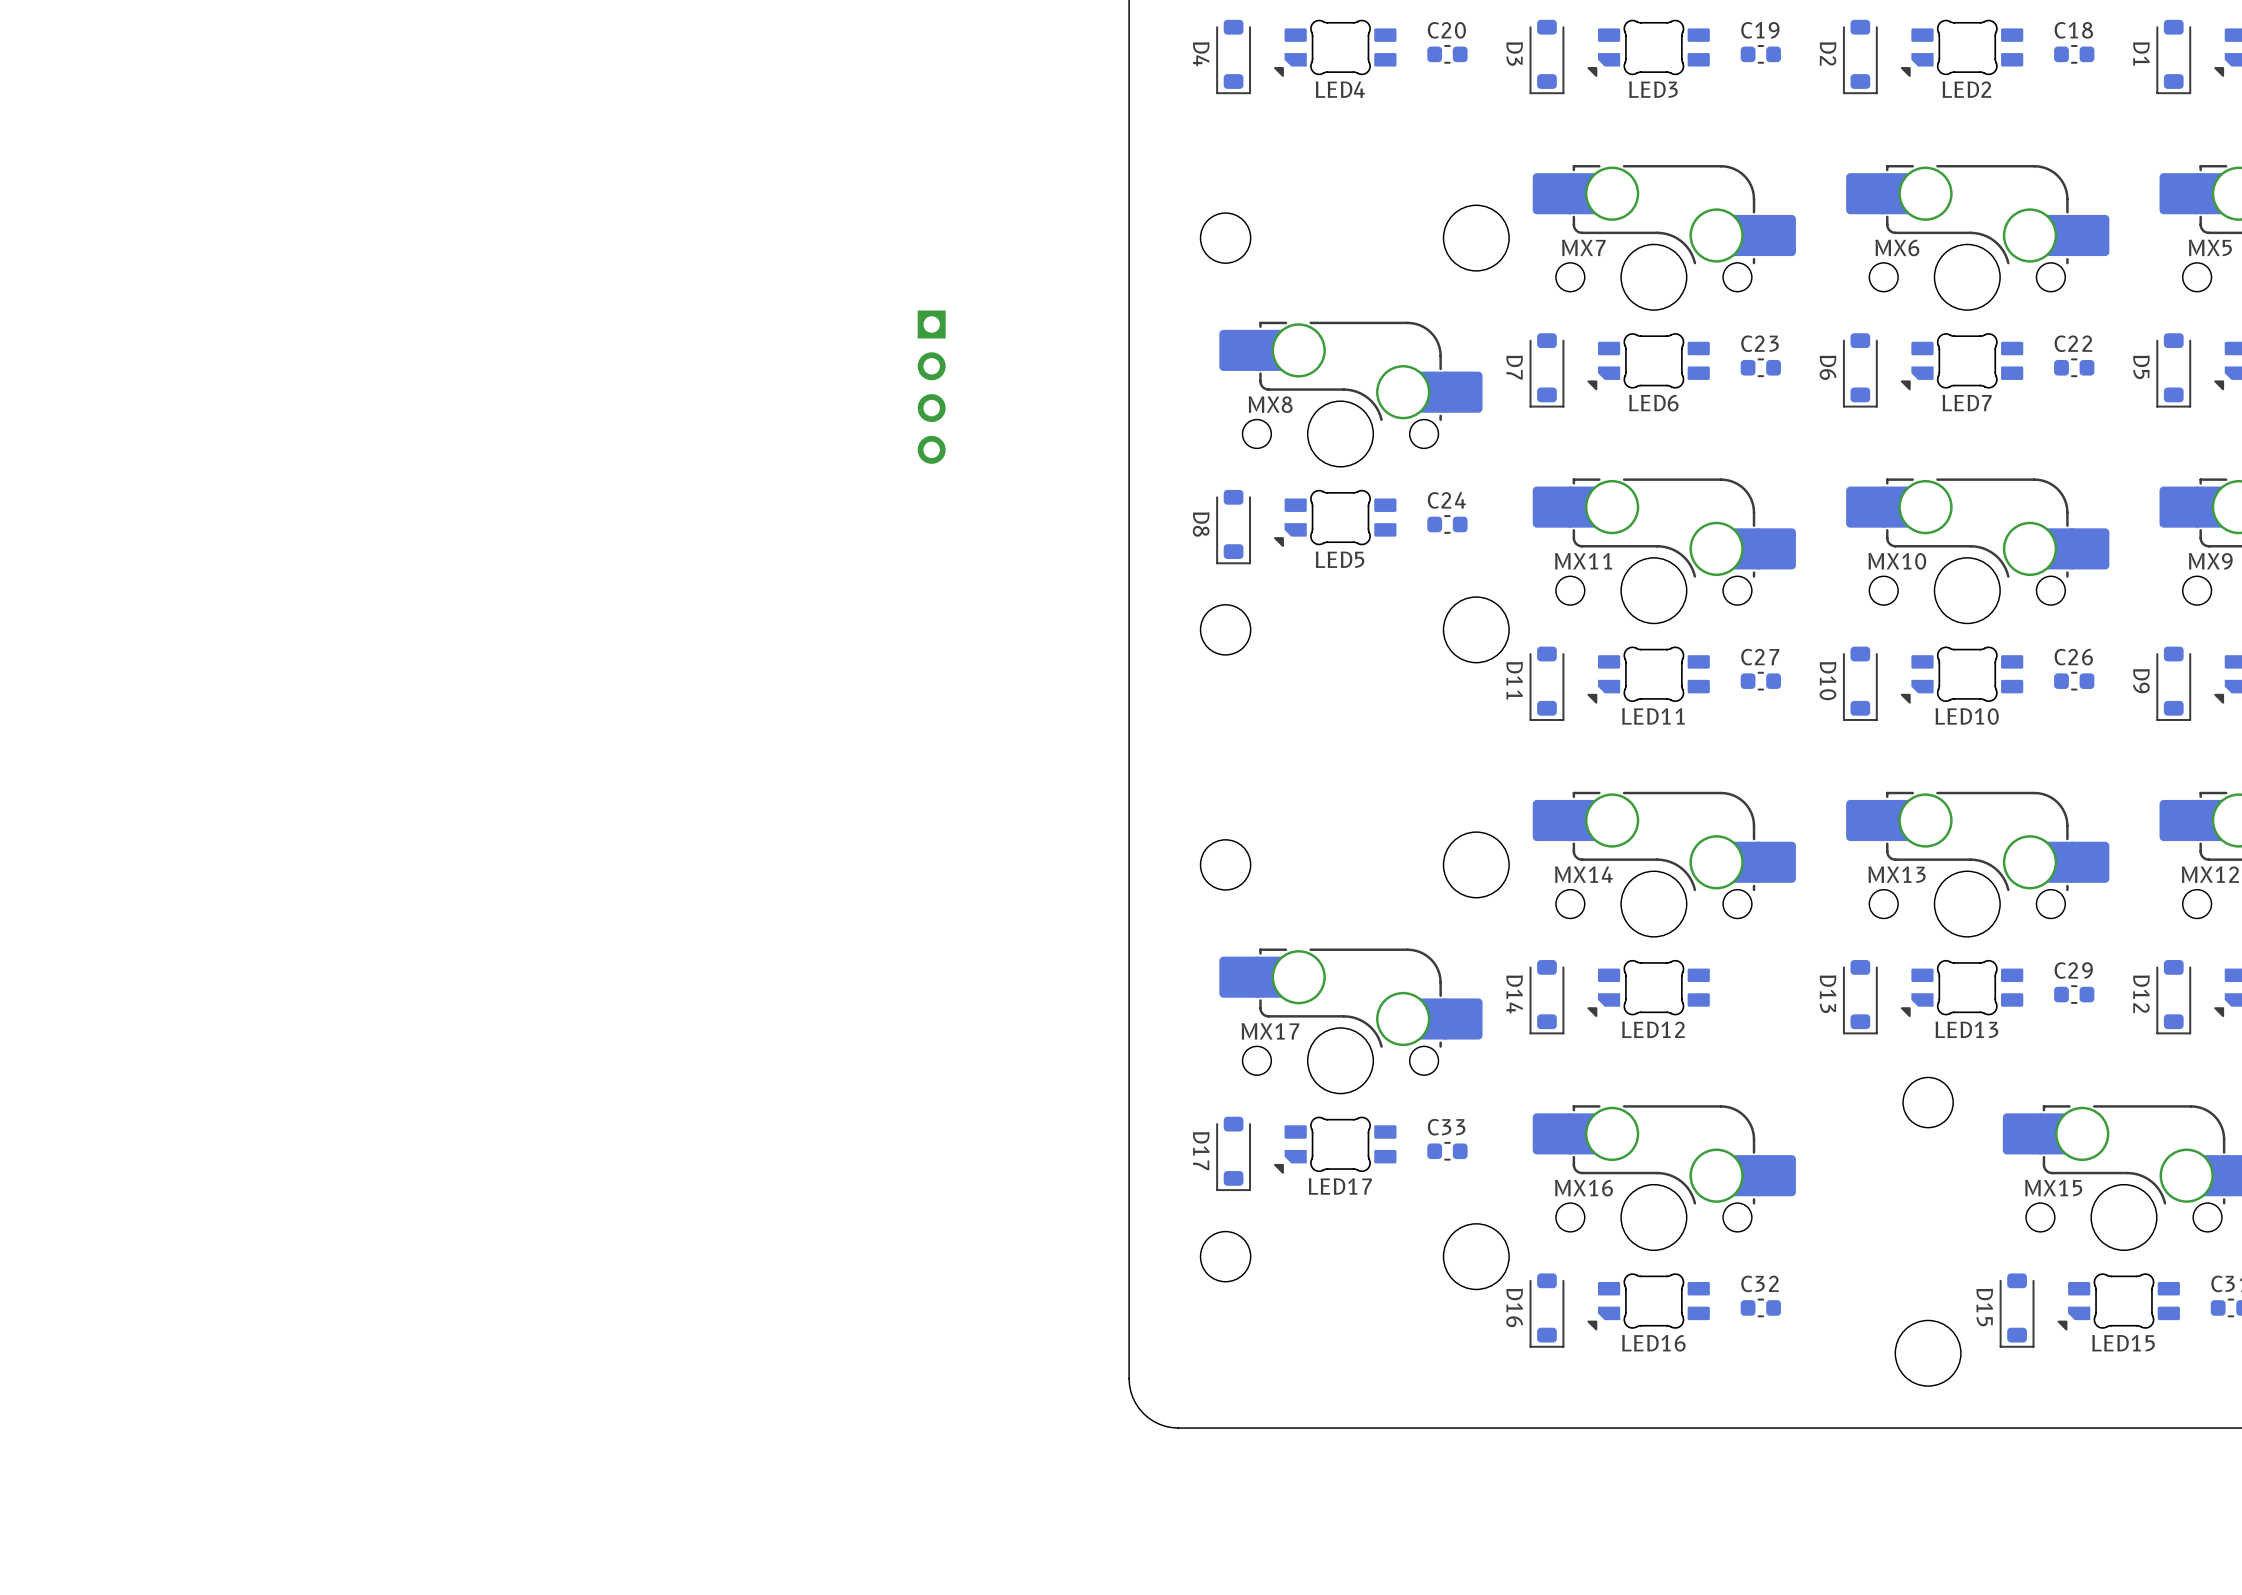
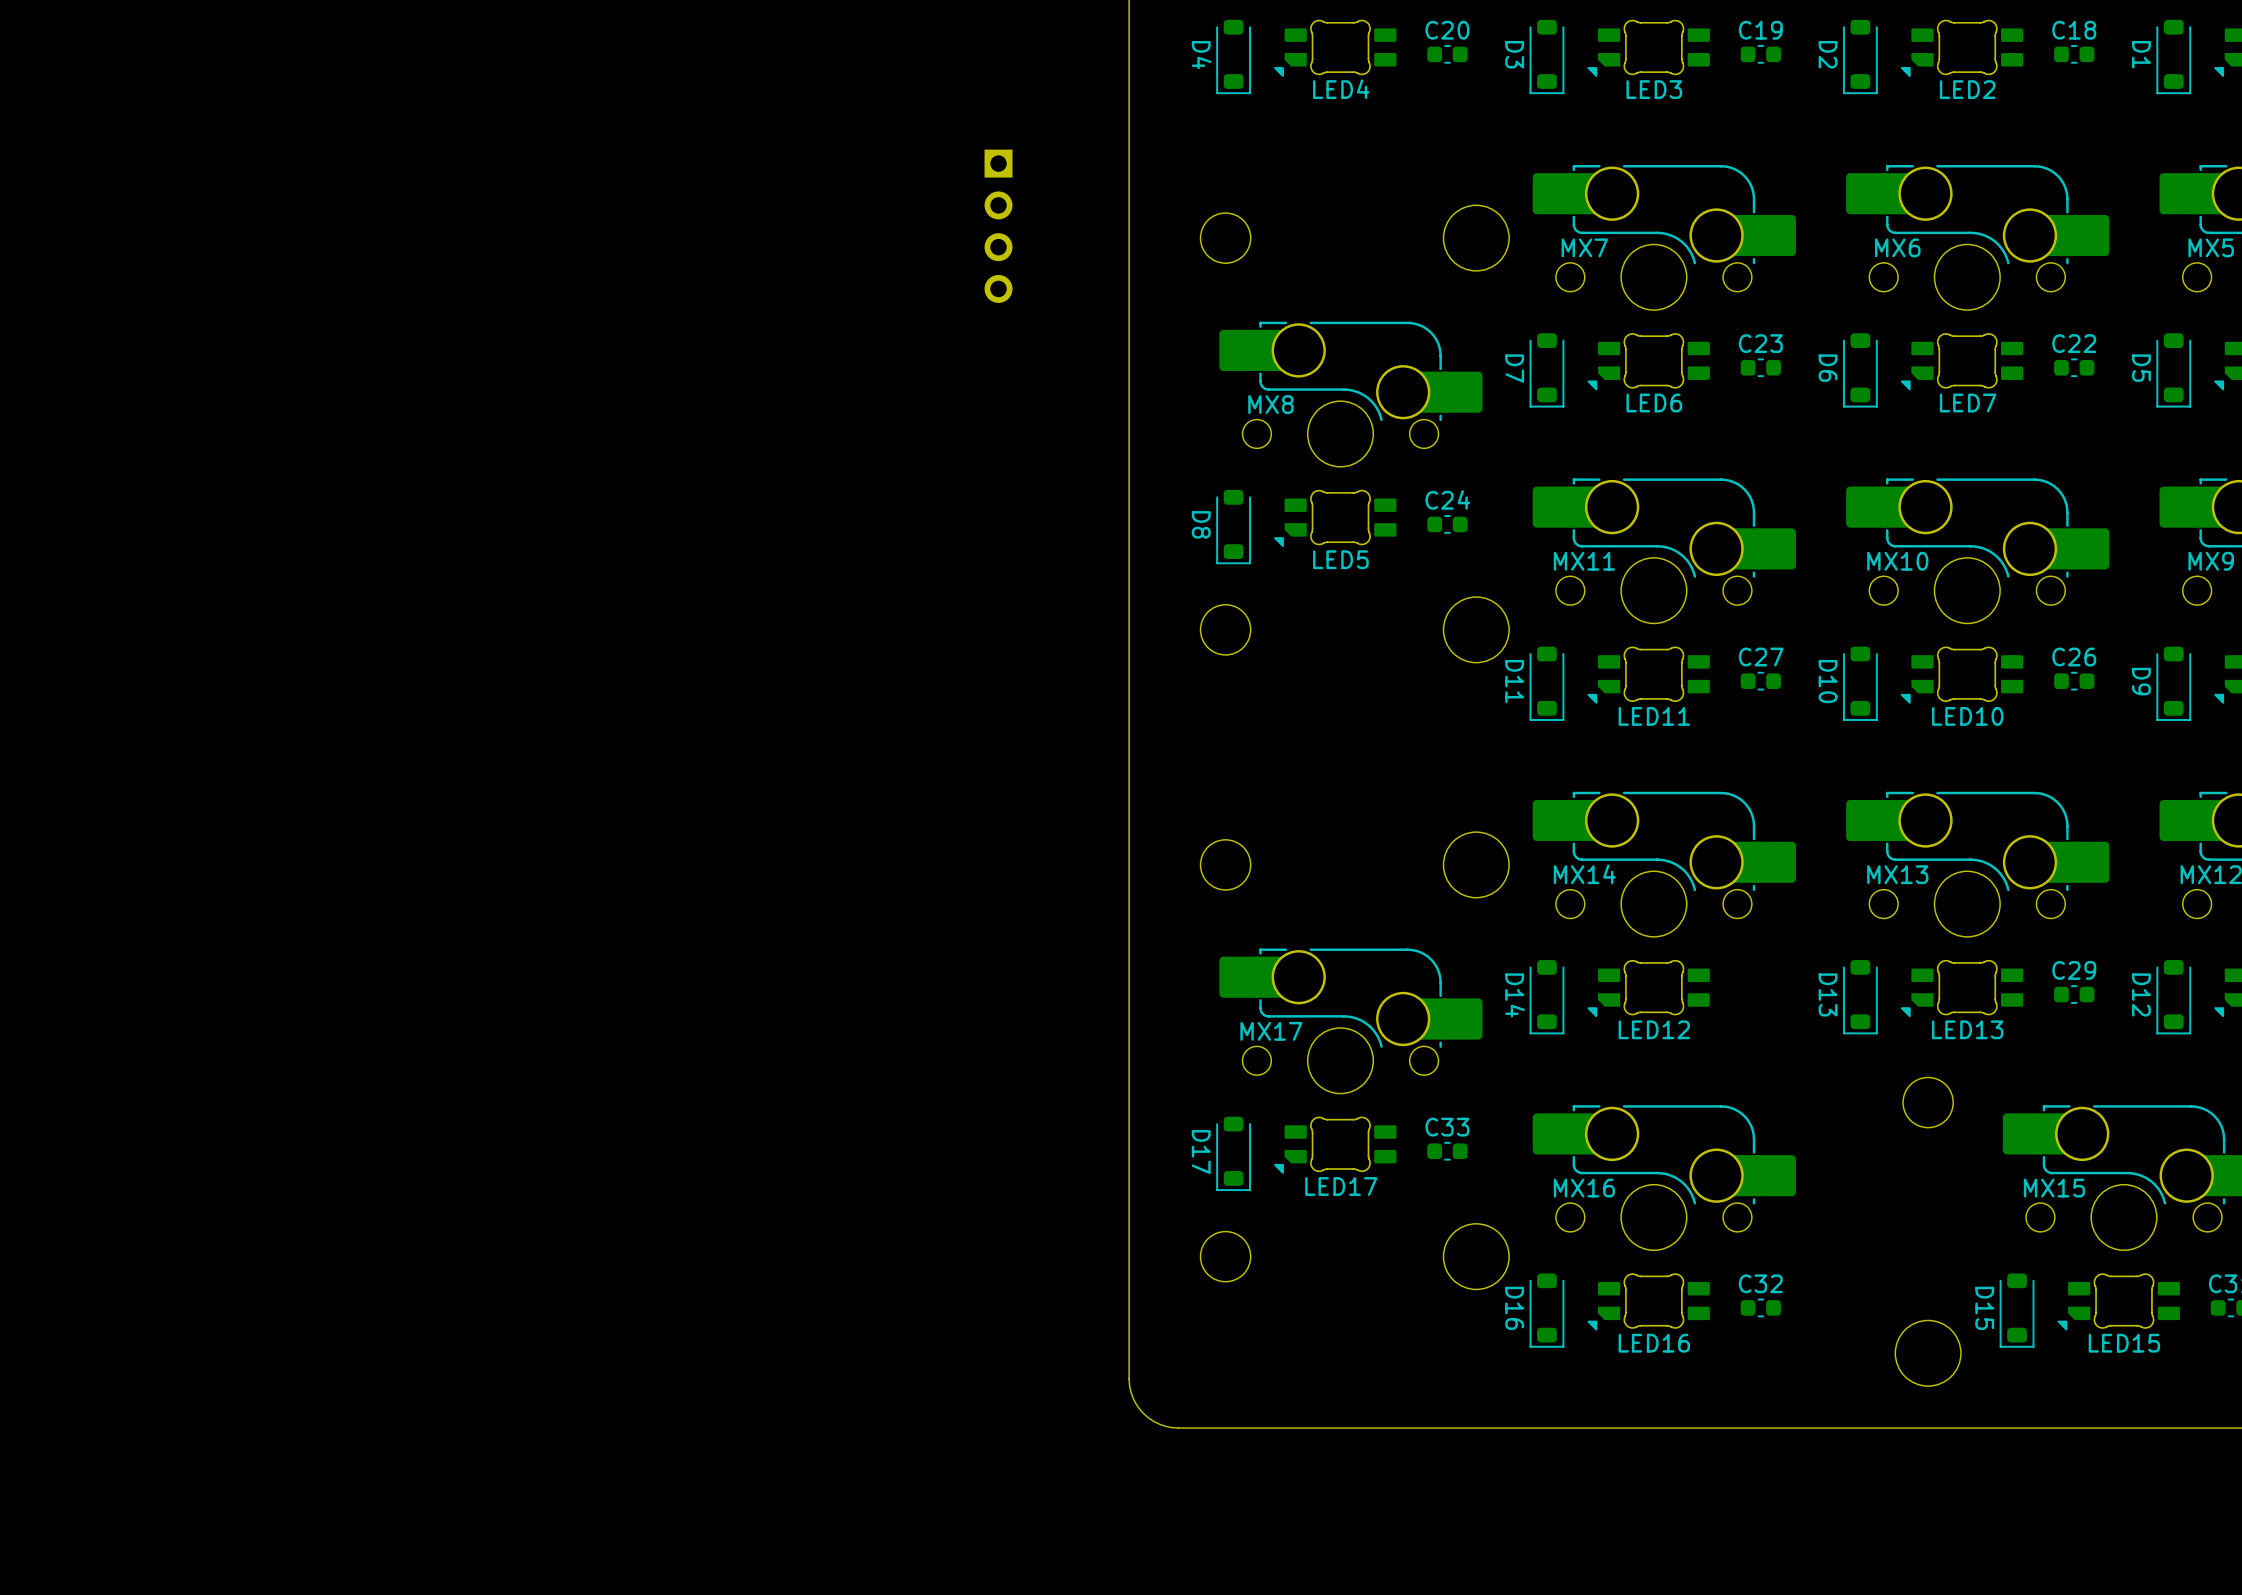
part position: (931, 387) -> (998, 226)

